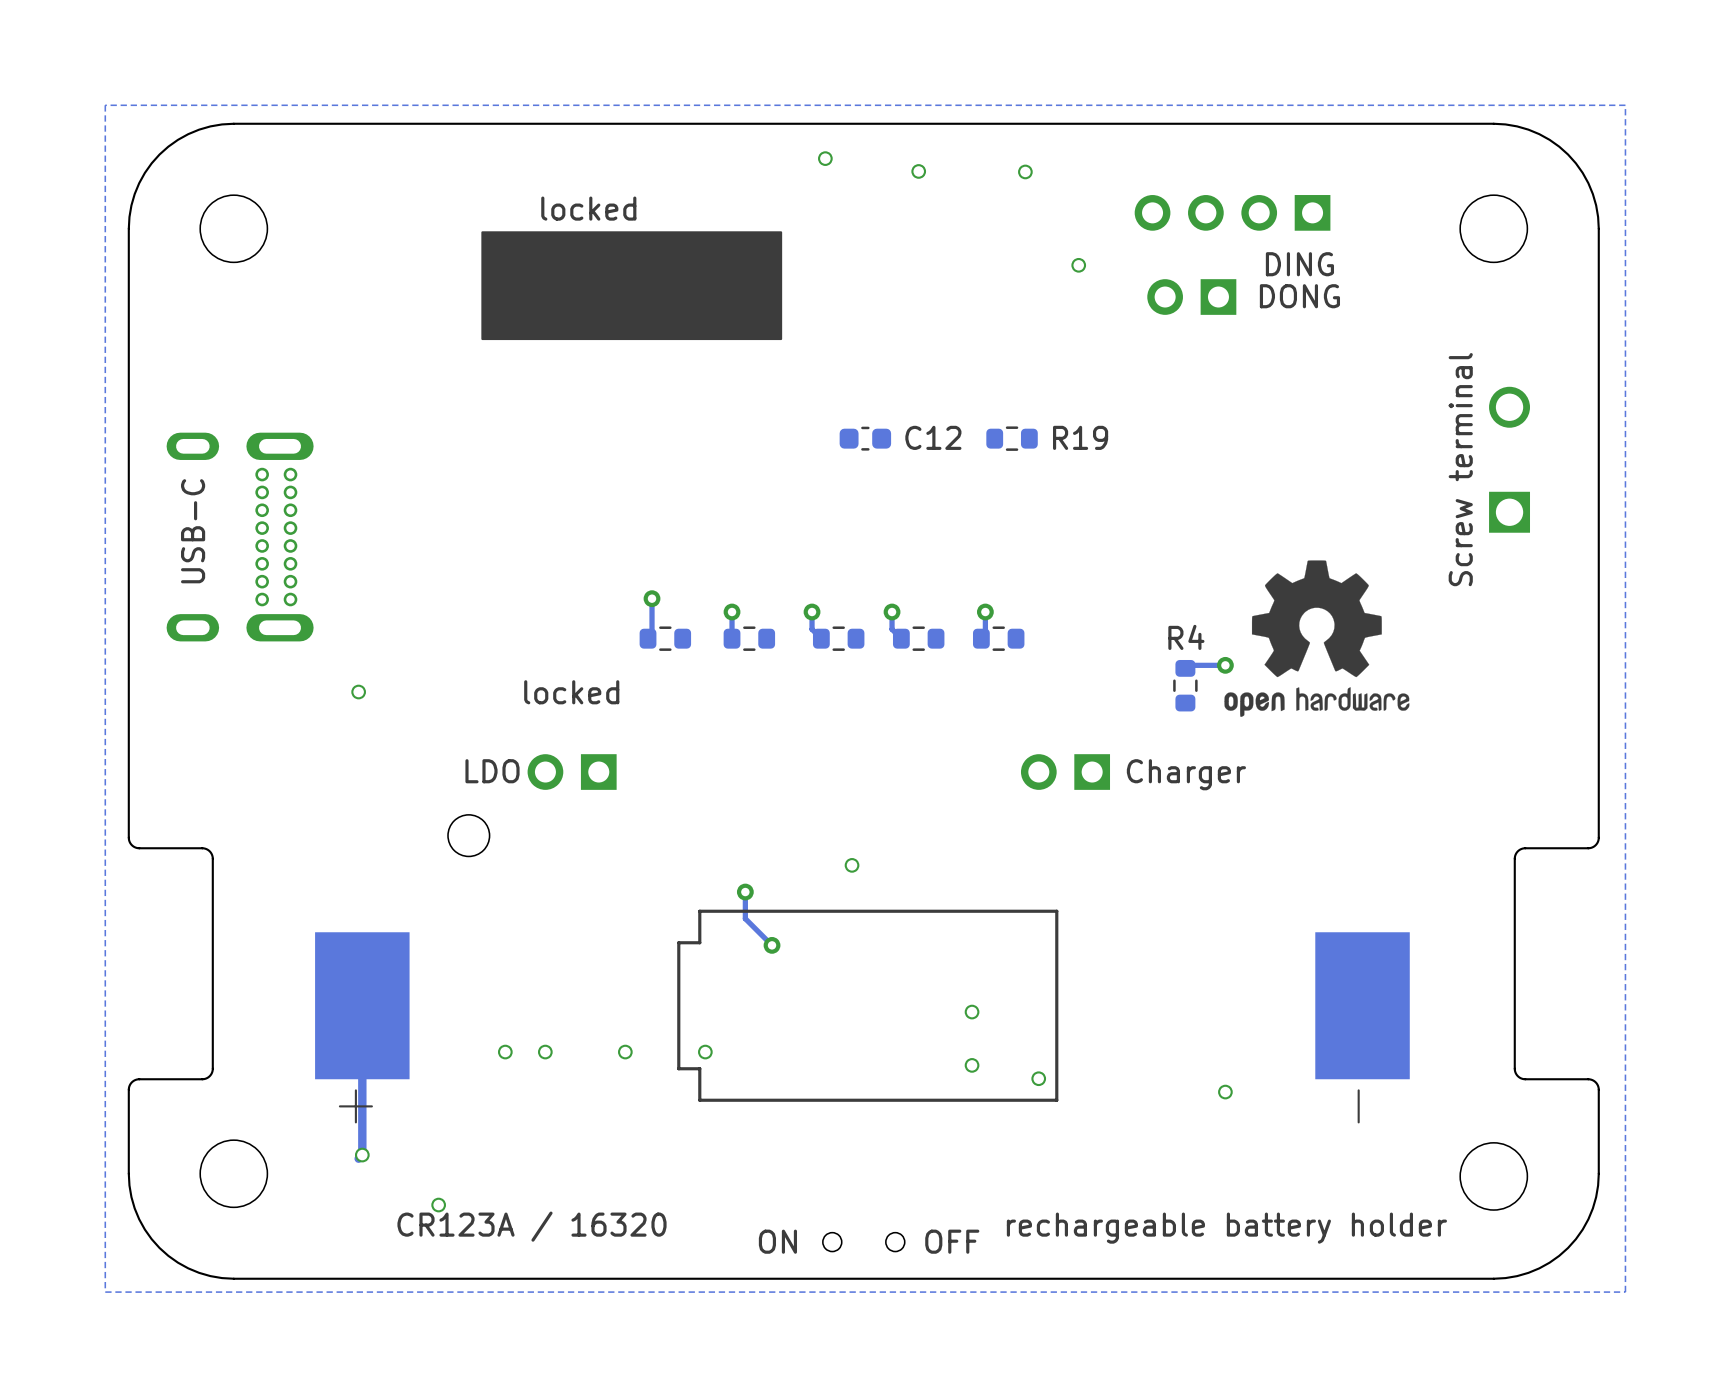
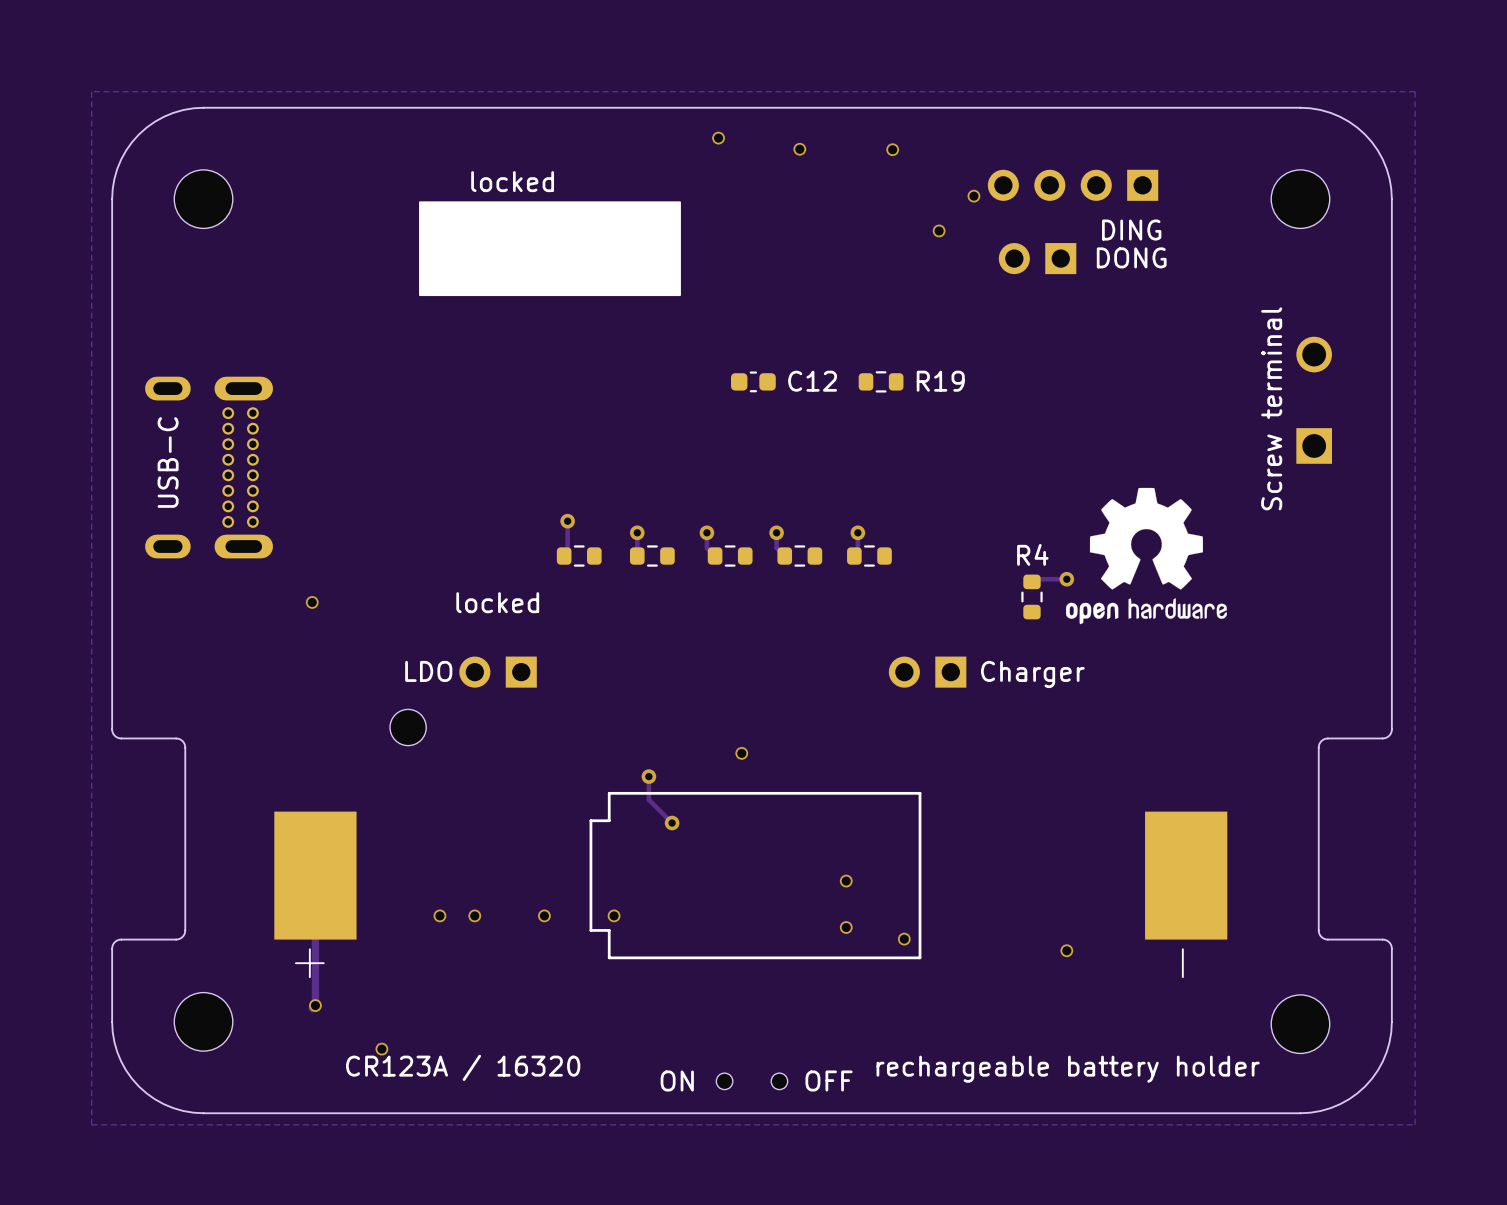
via: none -> (973, 196)

